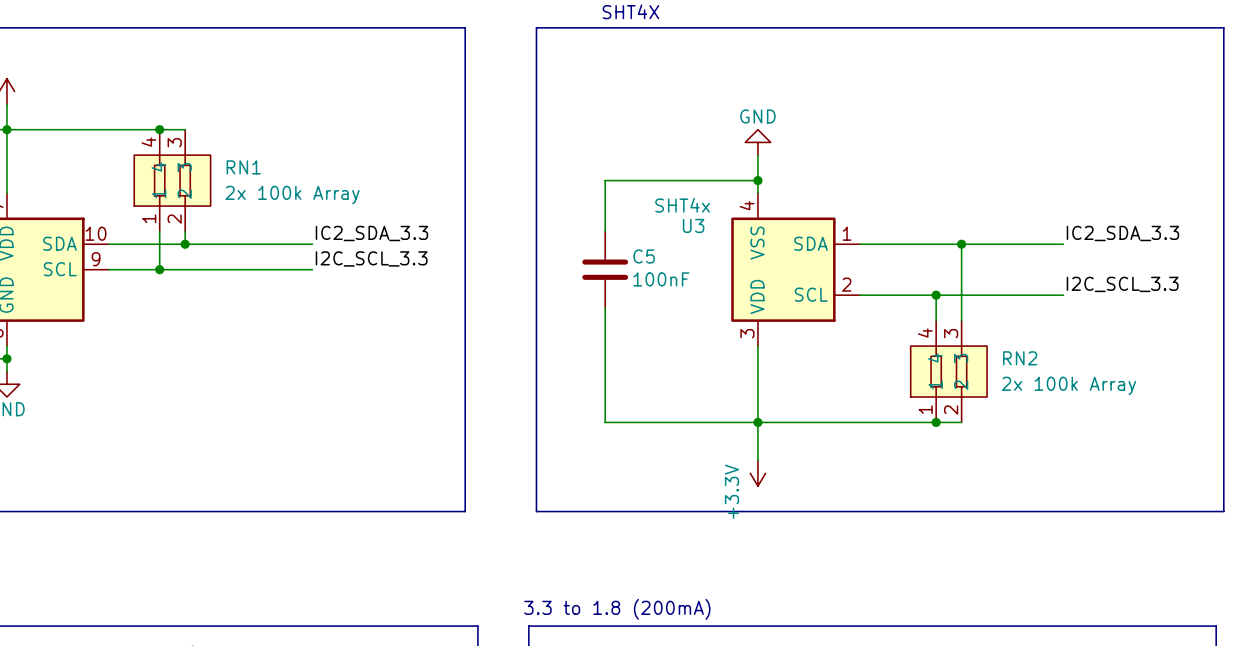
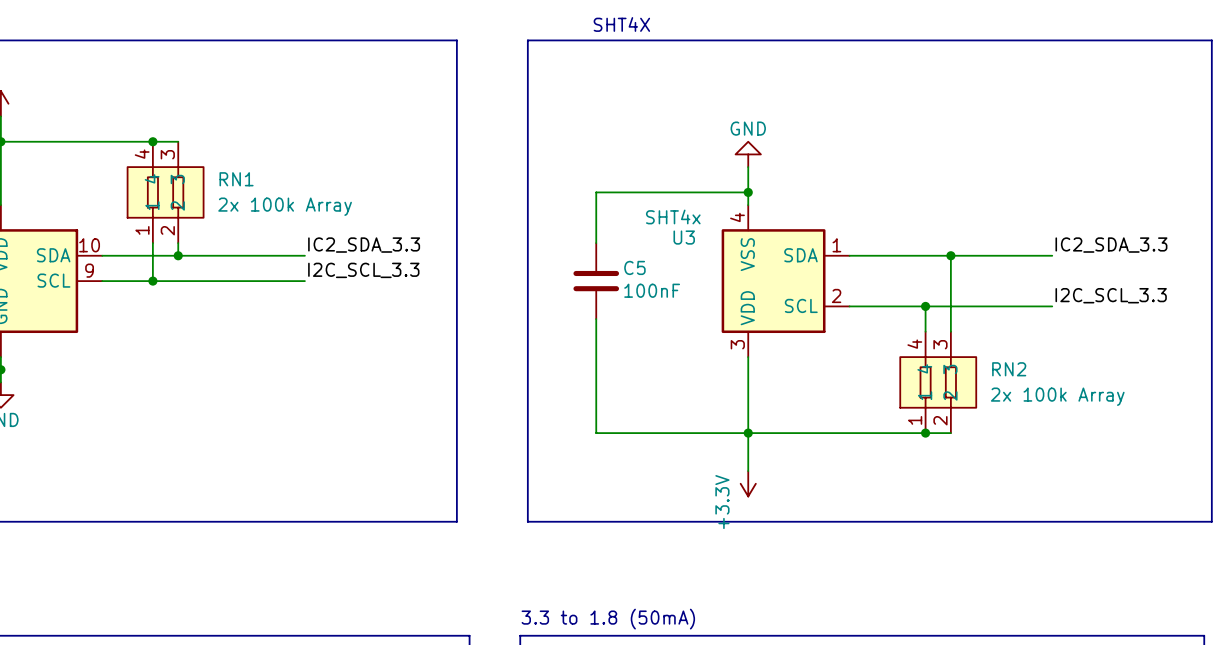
text: 3.3 to 1.8 (200mA) (617, 609) -> 3.3 to 1.8 (50mA) (608, 619)

